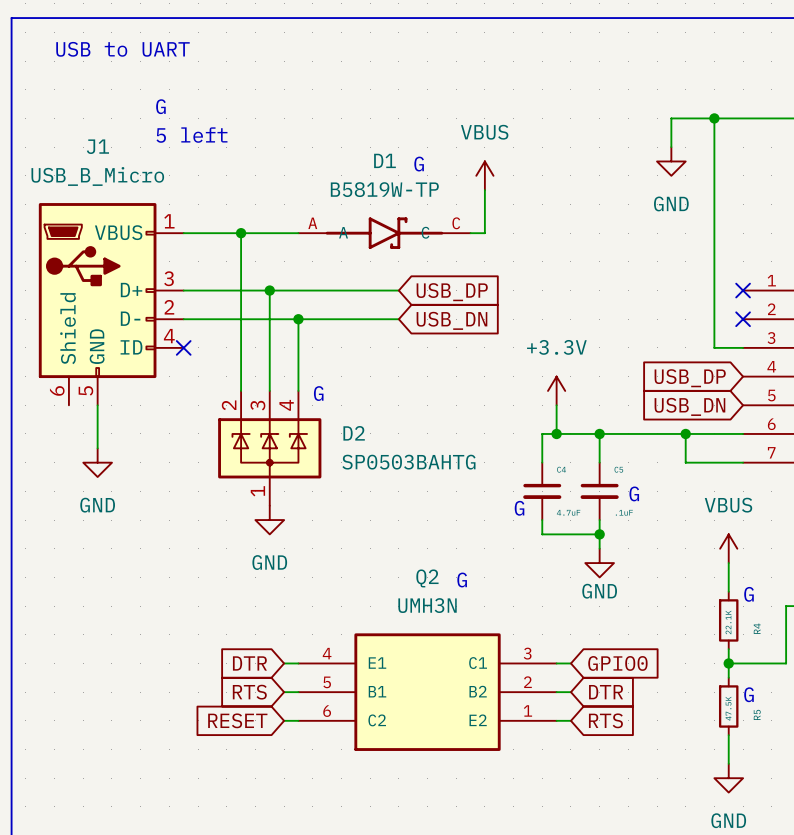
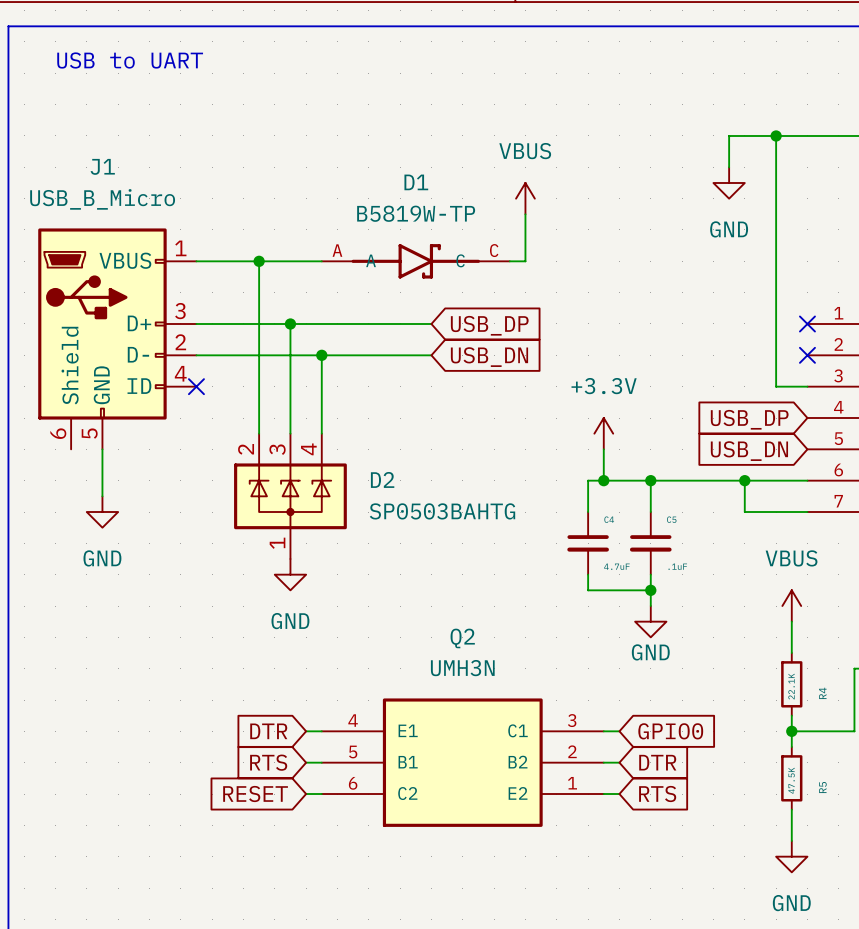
text: G (160, 106) -> none
text: 5 left (191, 135) -> none
text: G (419, 164) -> none
text: G (318, 393) -> none
text: G (634, 493) -> none
text: G (519, 508) -> none
text: G (462, 580) -> none
text: G (749, 594) -> none
text: G (749, 694) -> none

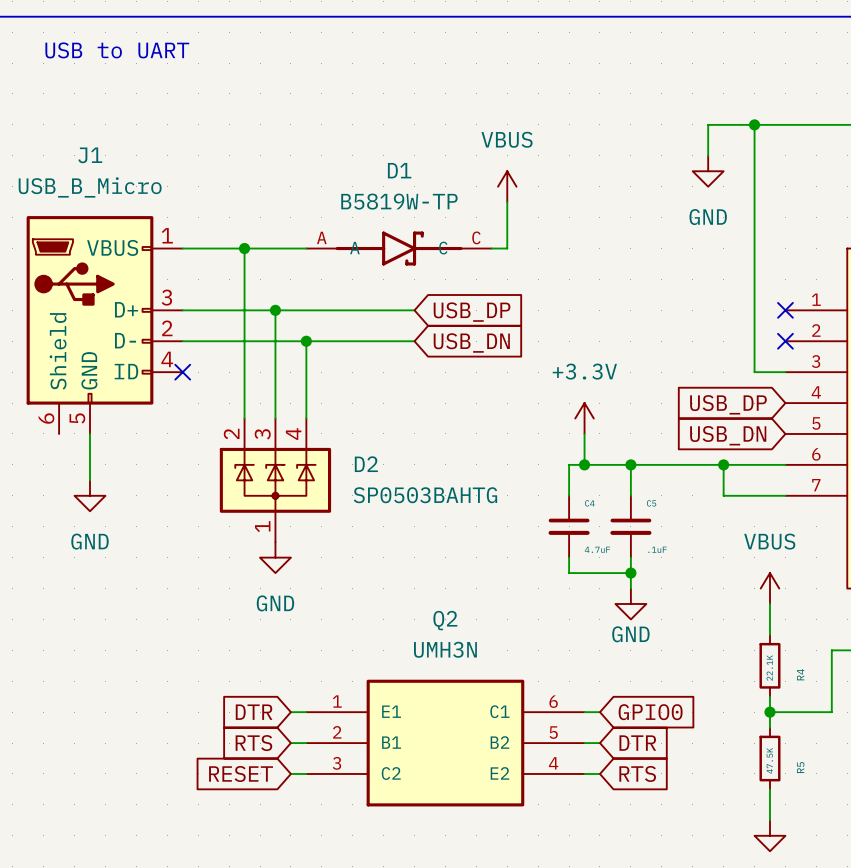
Q2 pin number: 4 (353, 720) -> 1 (337, 701)
Q2 pin number: 3 (572, 720) -> 6 (553, 701)
Q2 pin number: 2 (572, 751) -> 5 (553, 732)
Q2 pin number: 5 (353, 752) -> 2 (337, 732)
Q2 pin number: 6 (353, 783) -> 3 (336, 763)
Q2 pin number: 1 (572, 783) -> 4 (553, 763)

